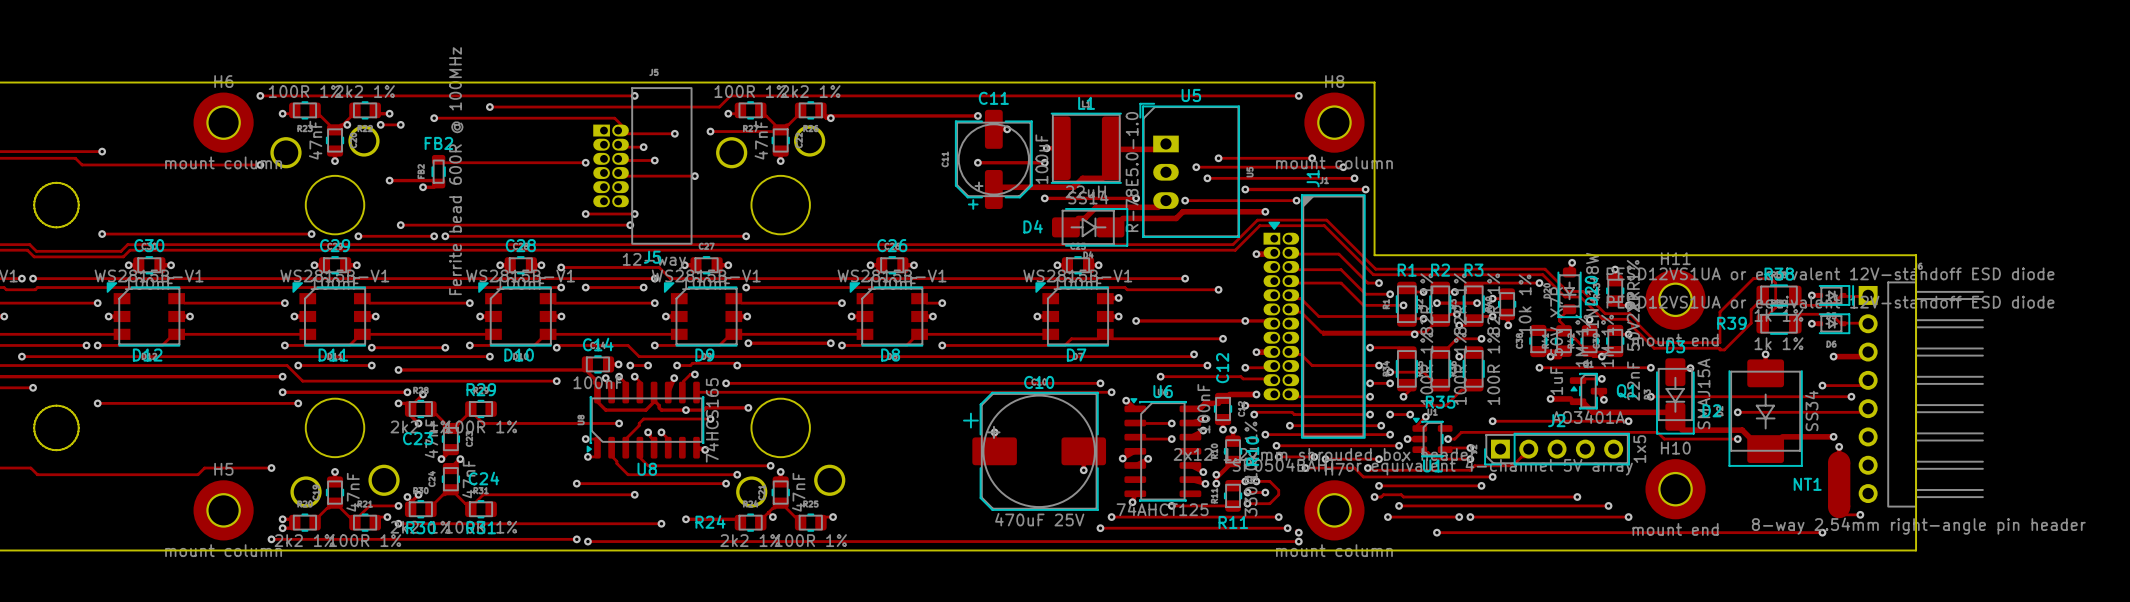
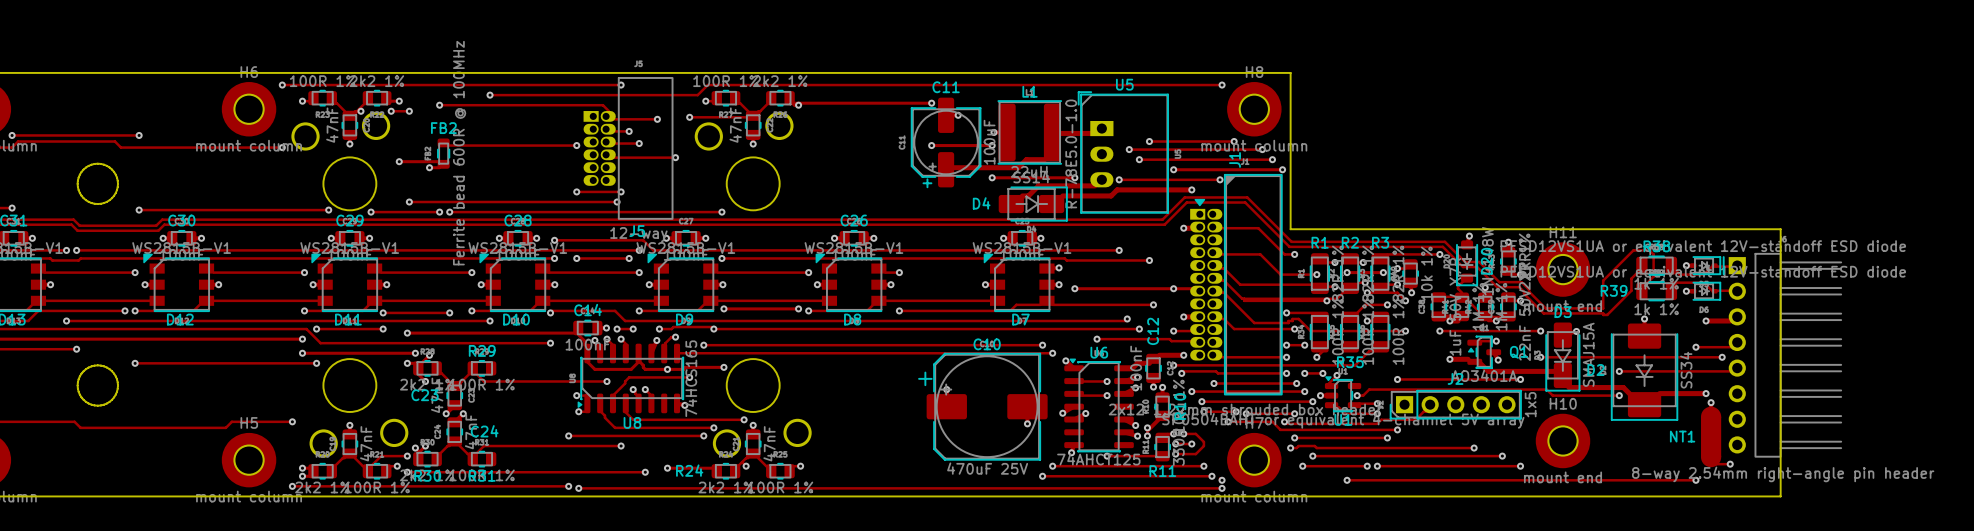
track: (1296, 269) (1341, 269) (1365, 294) (1390, 294) -> none
via: (1390, 294) -> none
track: none -> (1220, 292) (1224, 292) (1254, 323) (1288, 323) (1292, 318) (1298, 318) (1310, 331) (1405, 331)
track: none -> (1387, 292) (1397, 292) (1405, 300)
via: none -> (1405, 300)
via: none -> (1405, 331)
track: (1390, 372) (1423, 372) (1432, 381) -> none
via: (1390, 372) -> none

